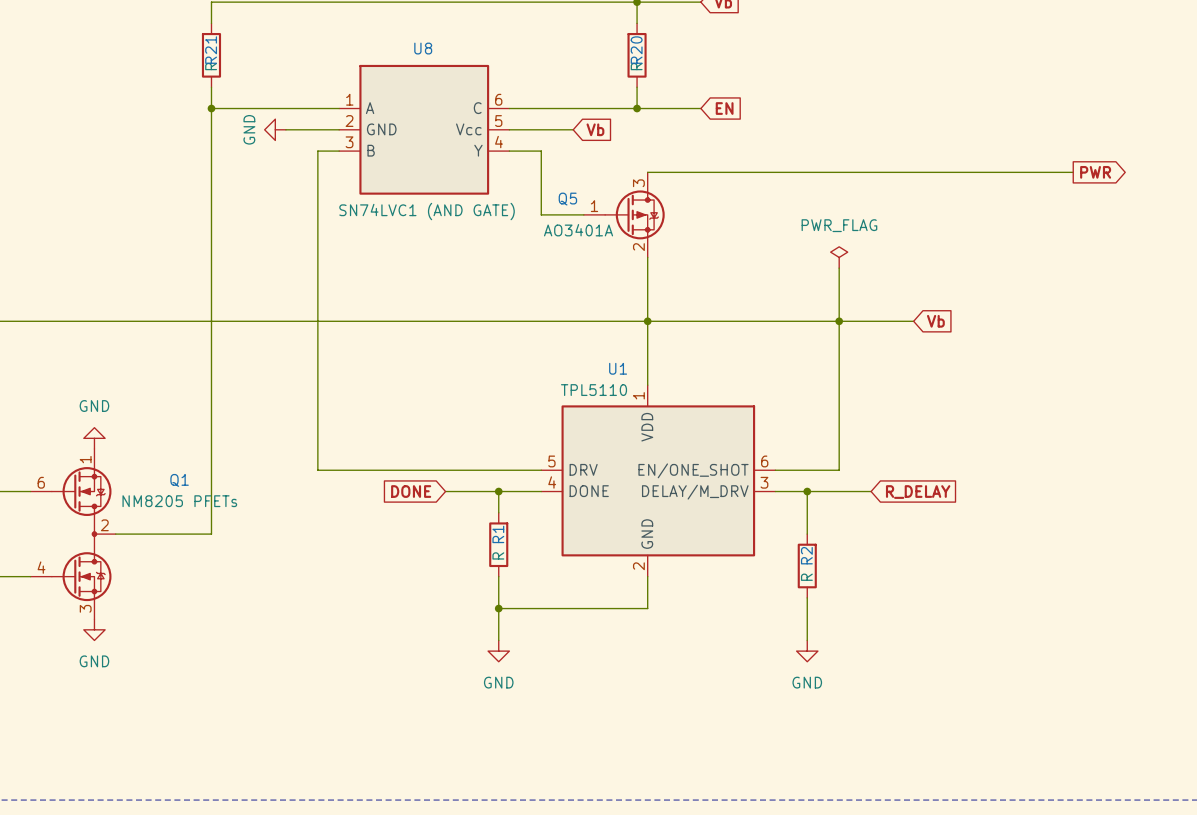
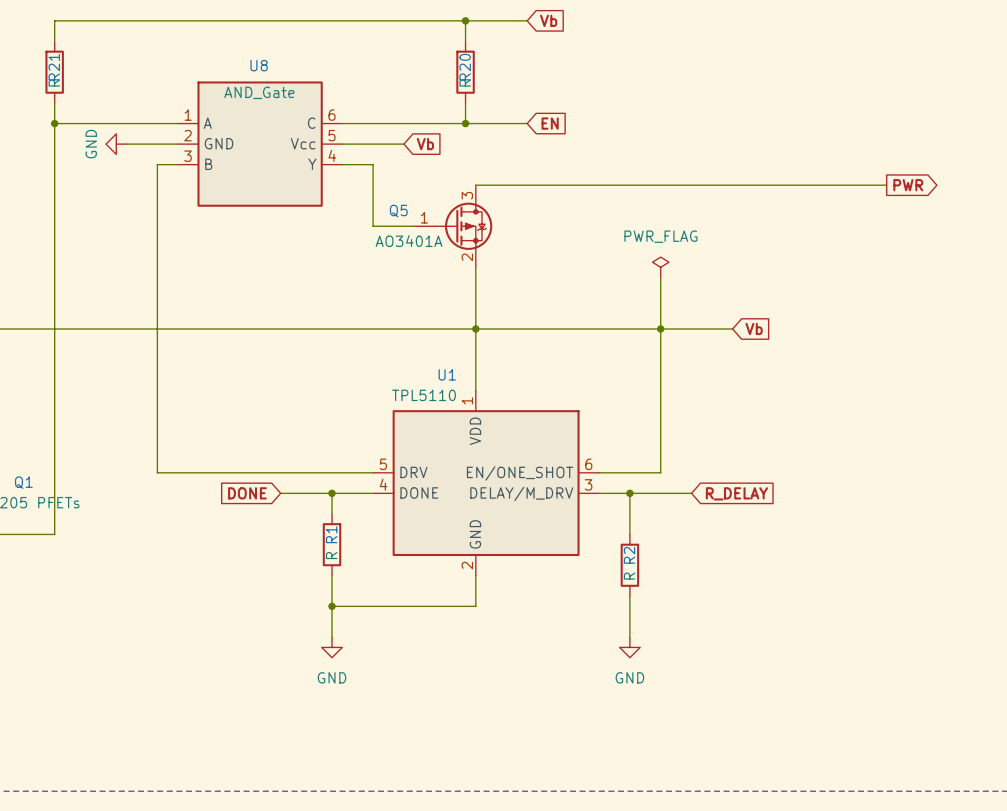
U8 value: SN74LVC1 (AND GATE) (427, 211) -> AND_Gate (259, 92)

